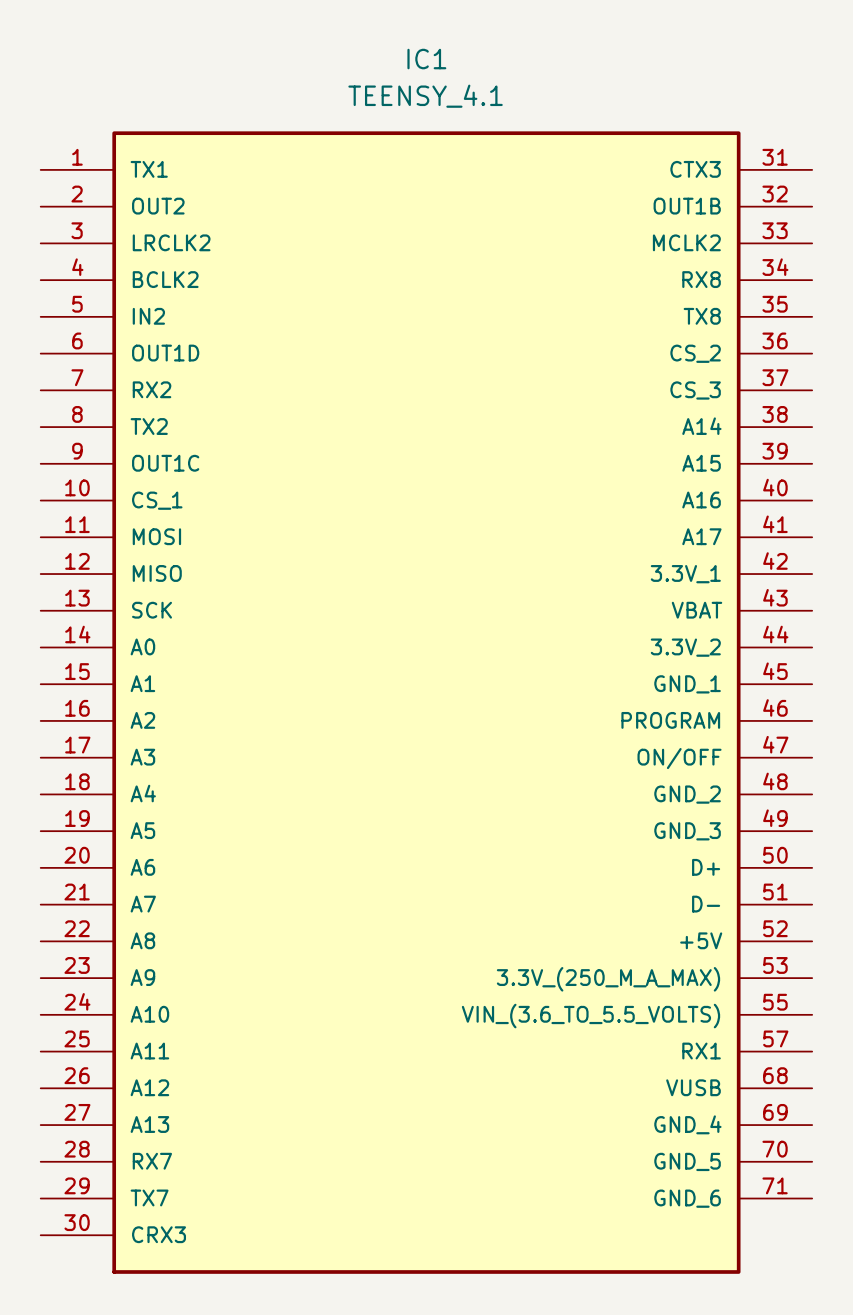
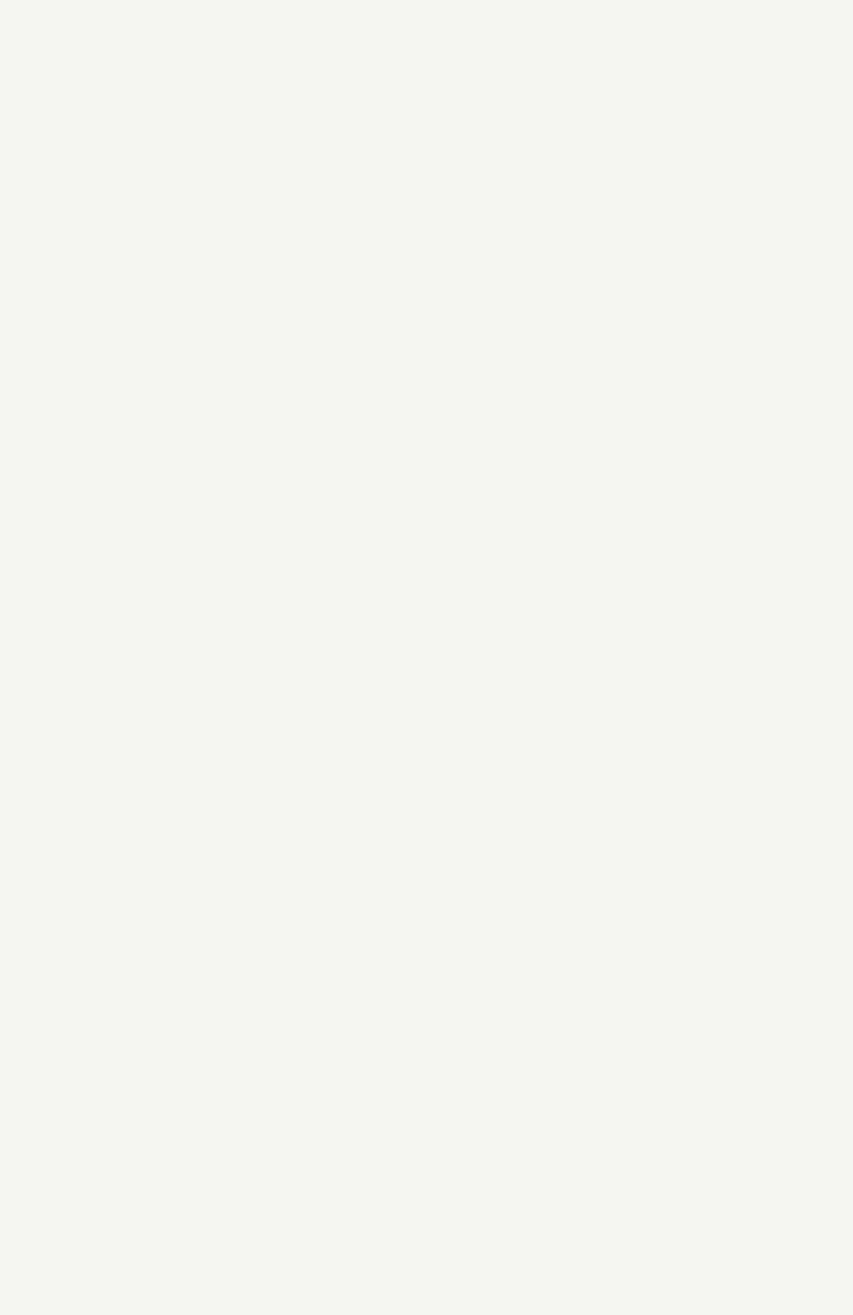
IC1: TEENSY_4.1 (426, 702) -> none

